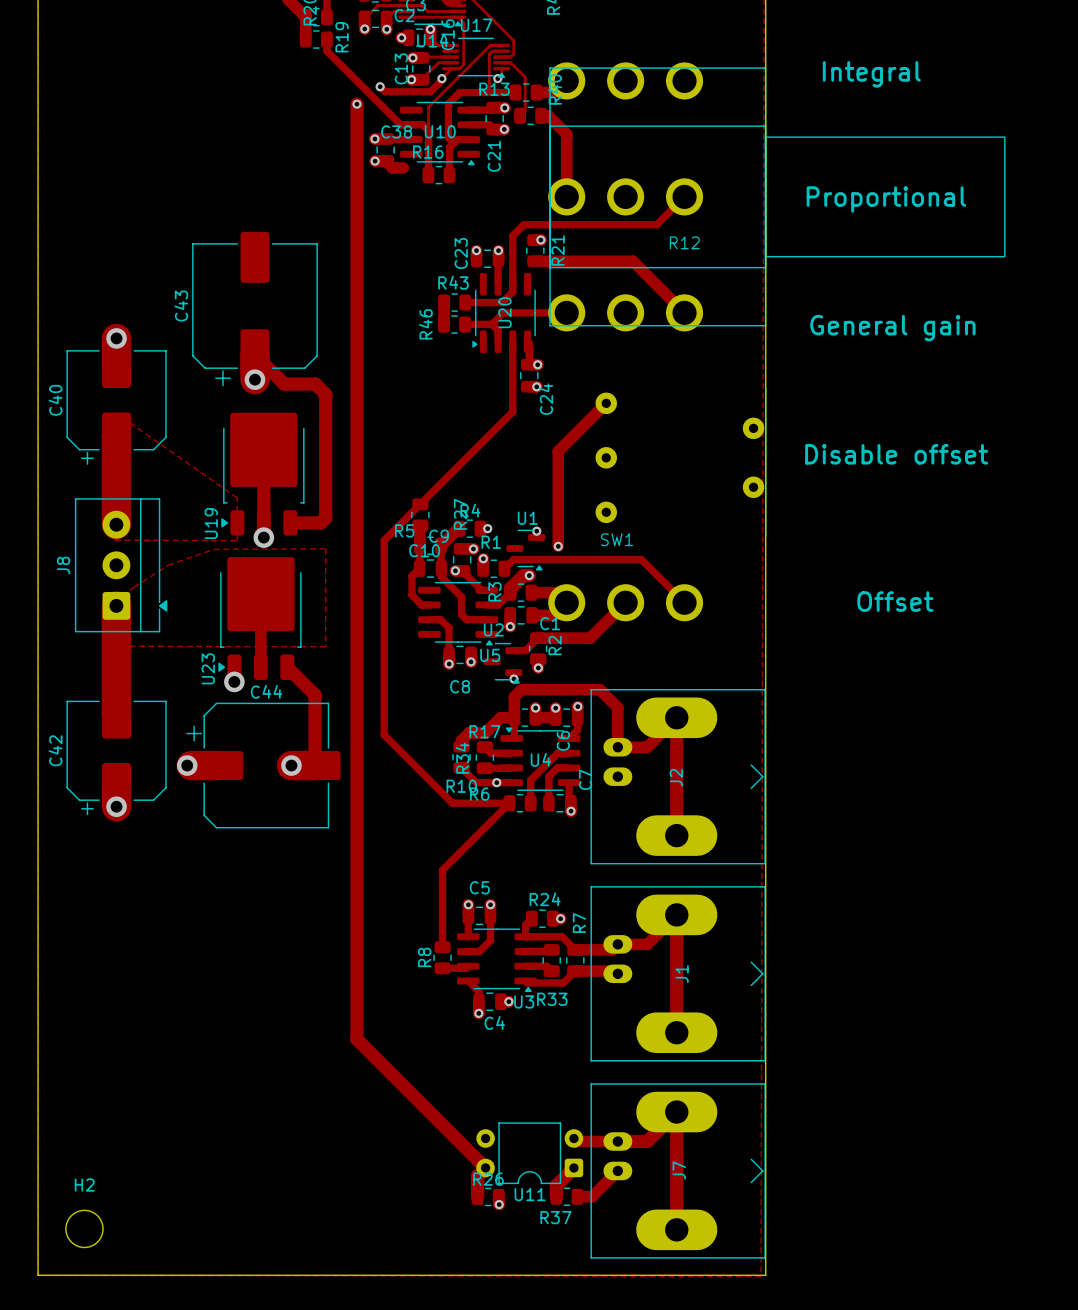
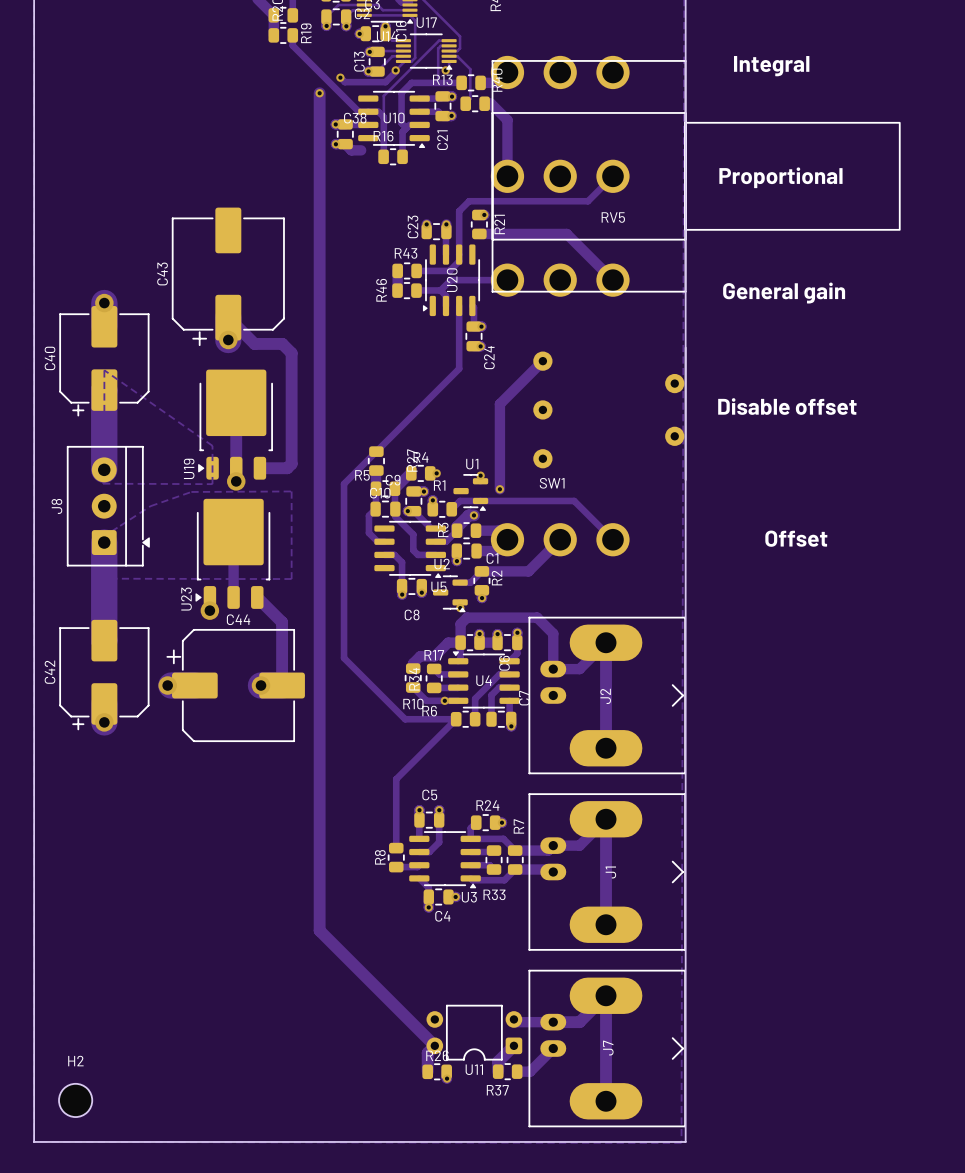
R12 name: R12 (684, 242) -> RV5 (613, 217)

